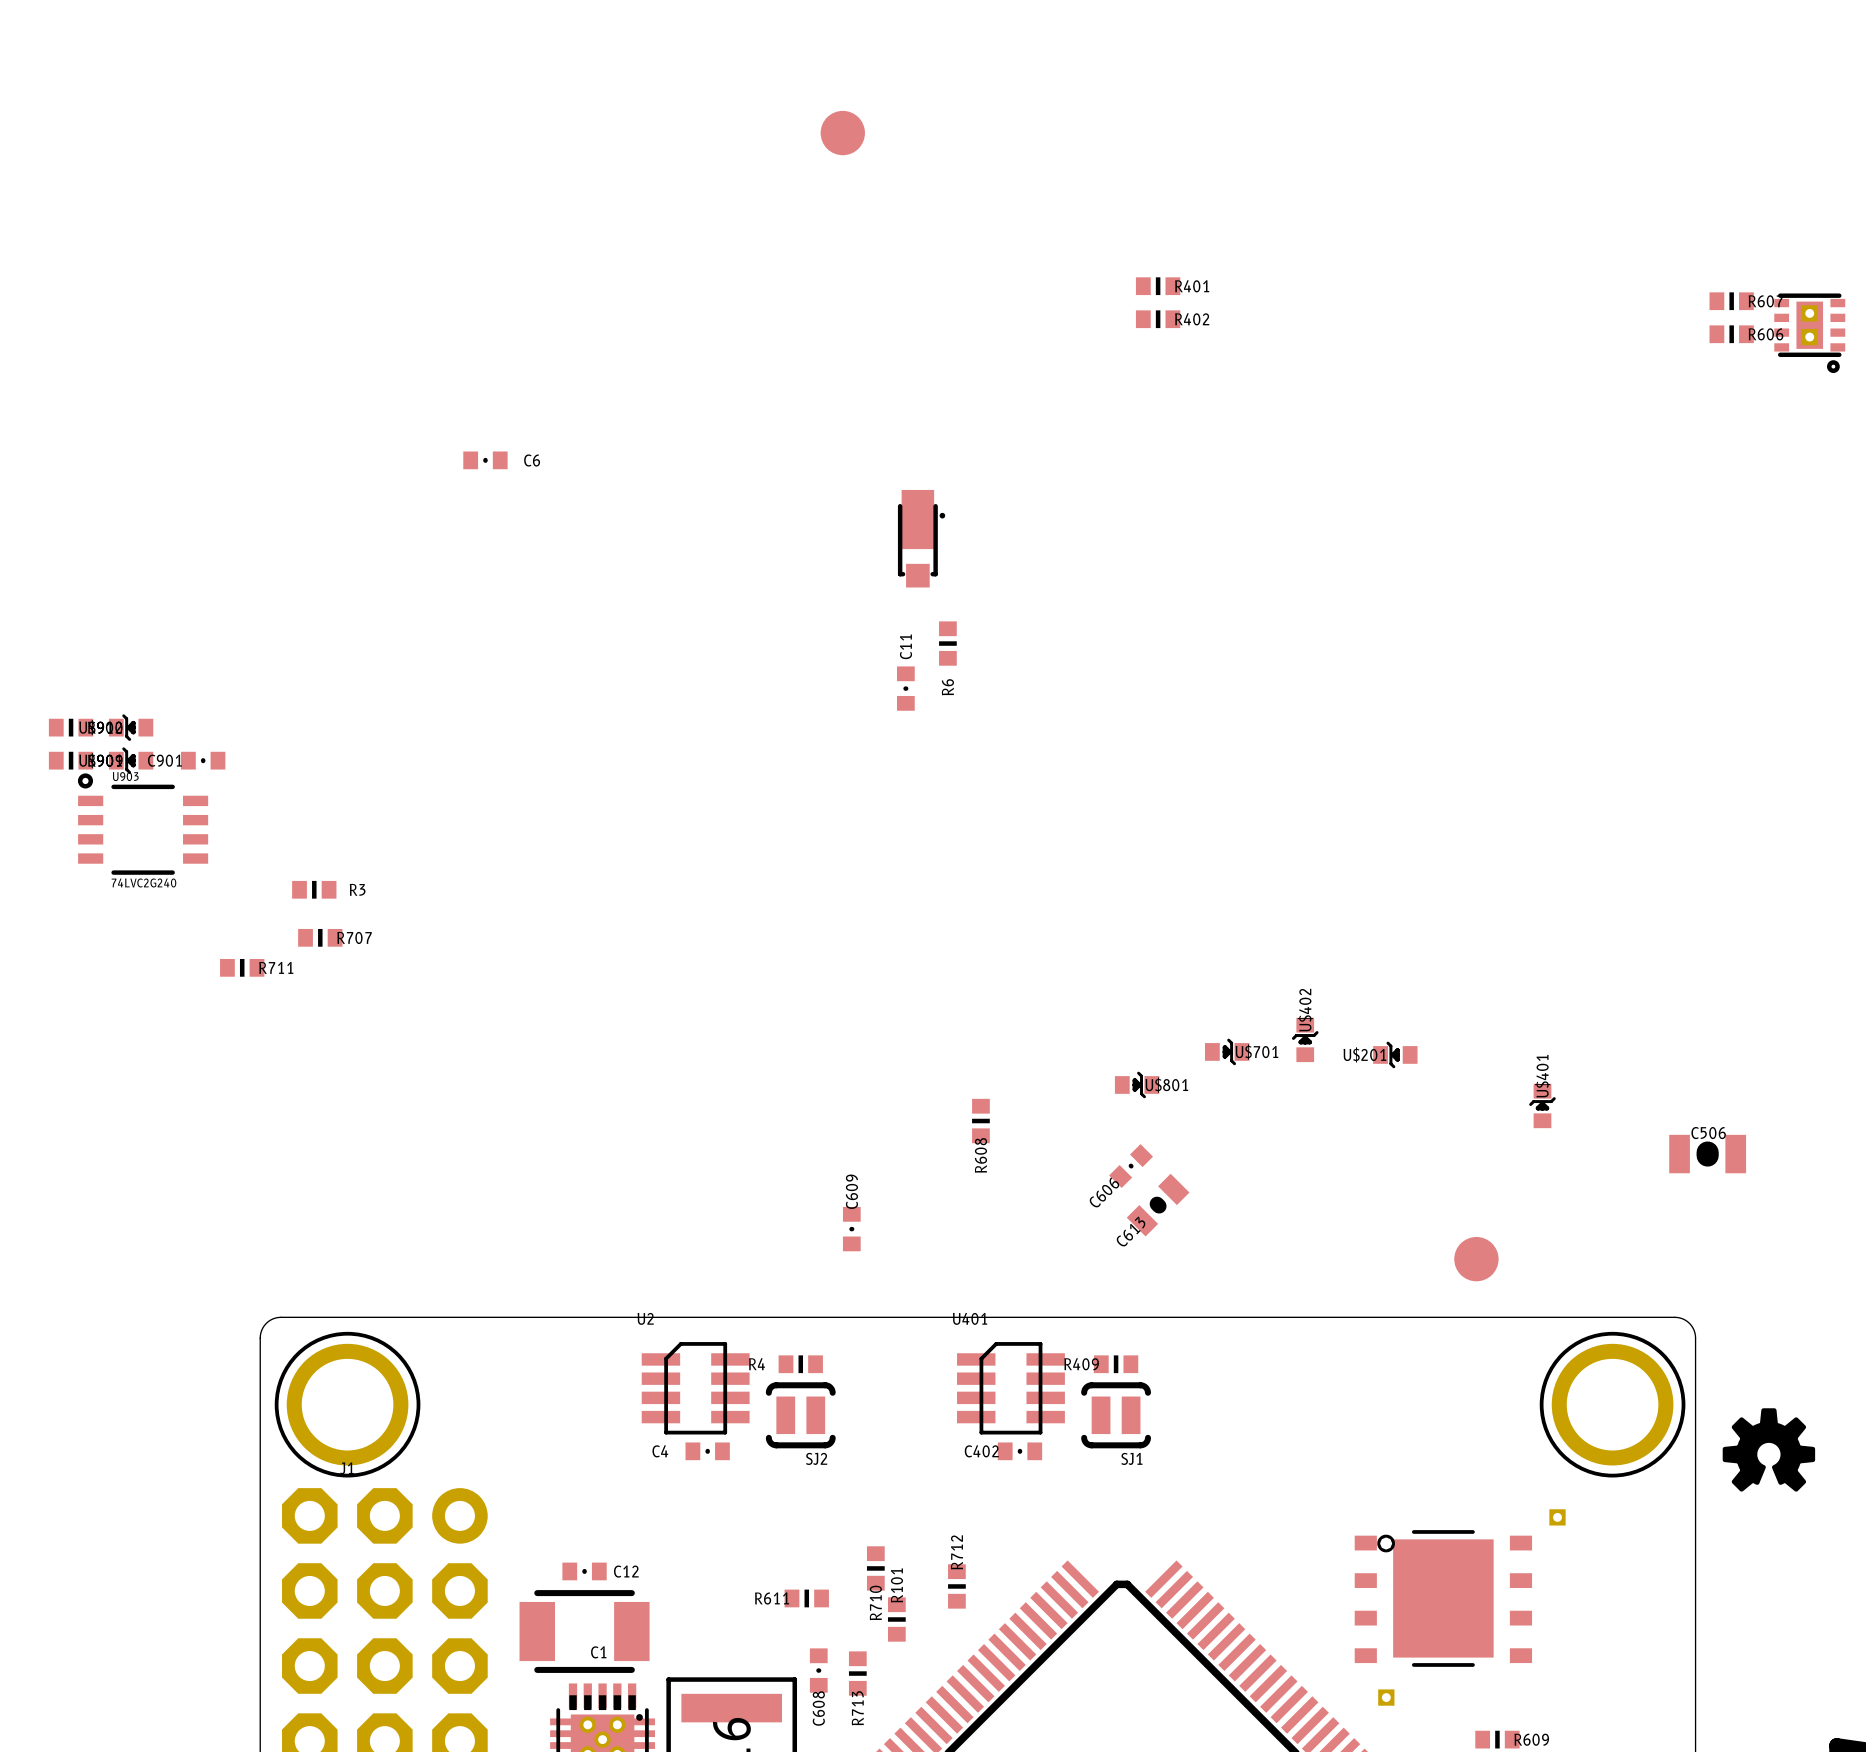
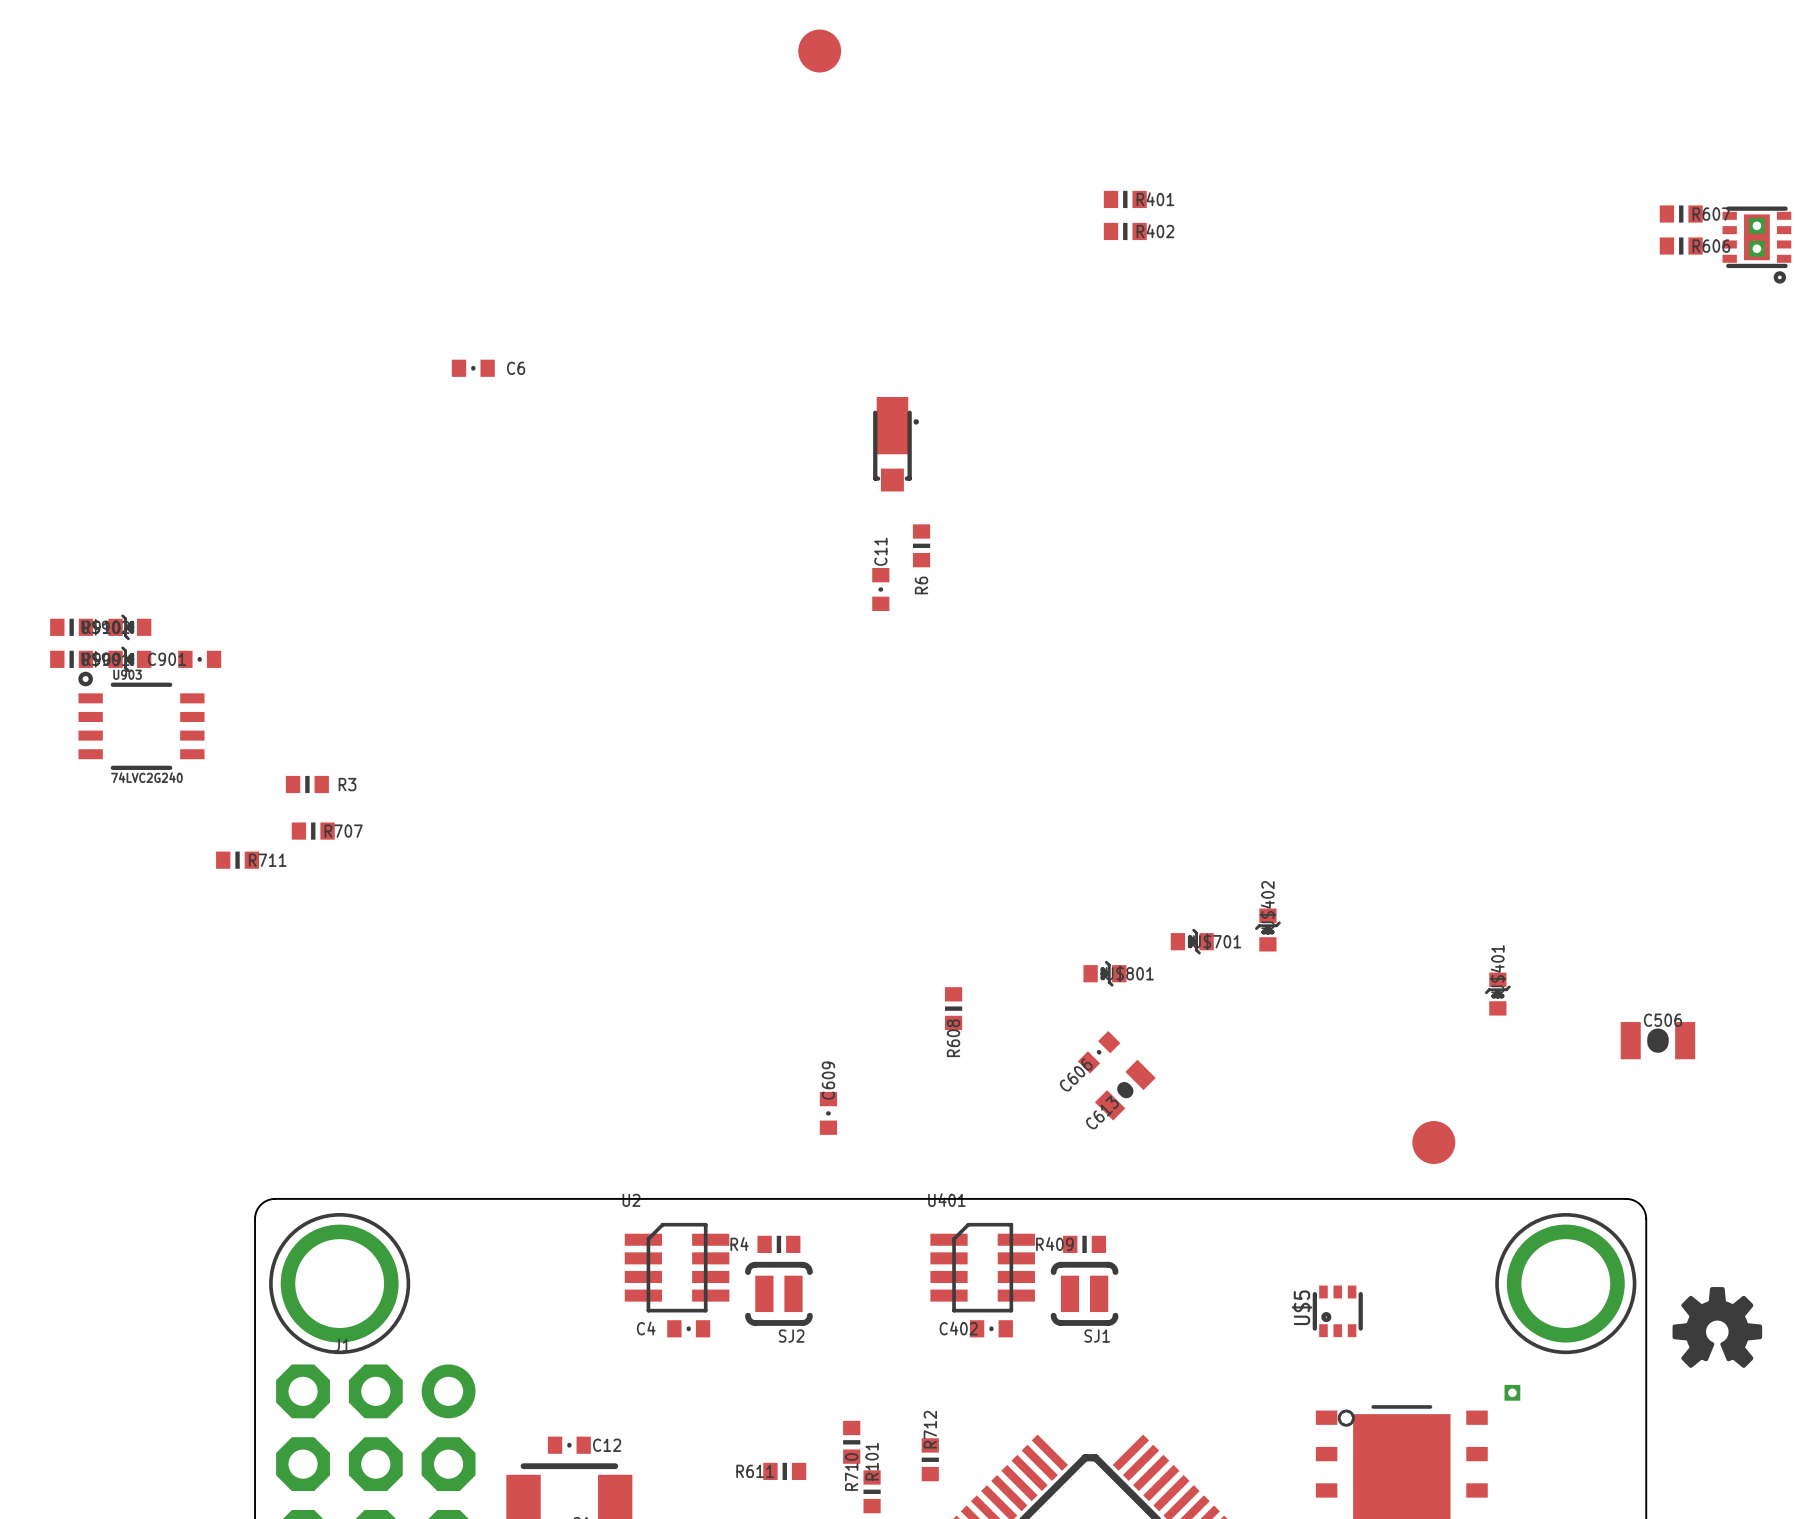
U$201: (1395, 1054) -> none
U$5: none -> (1337, 1311)

